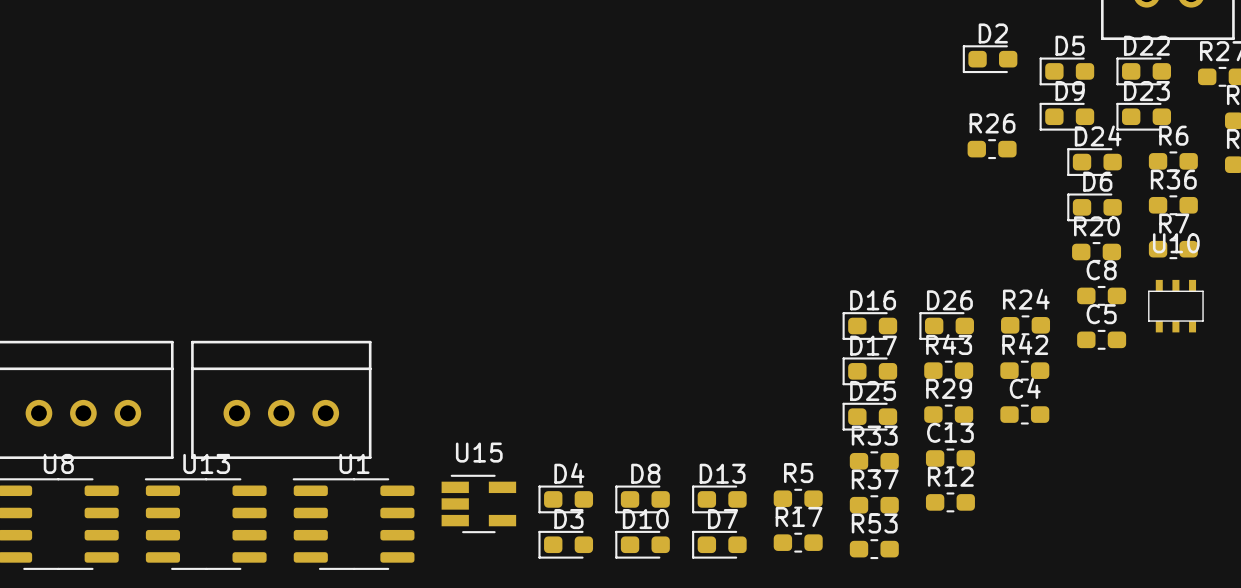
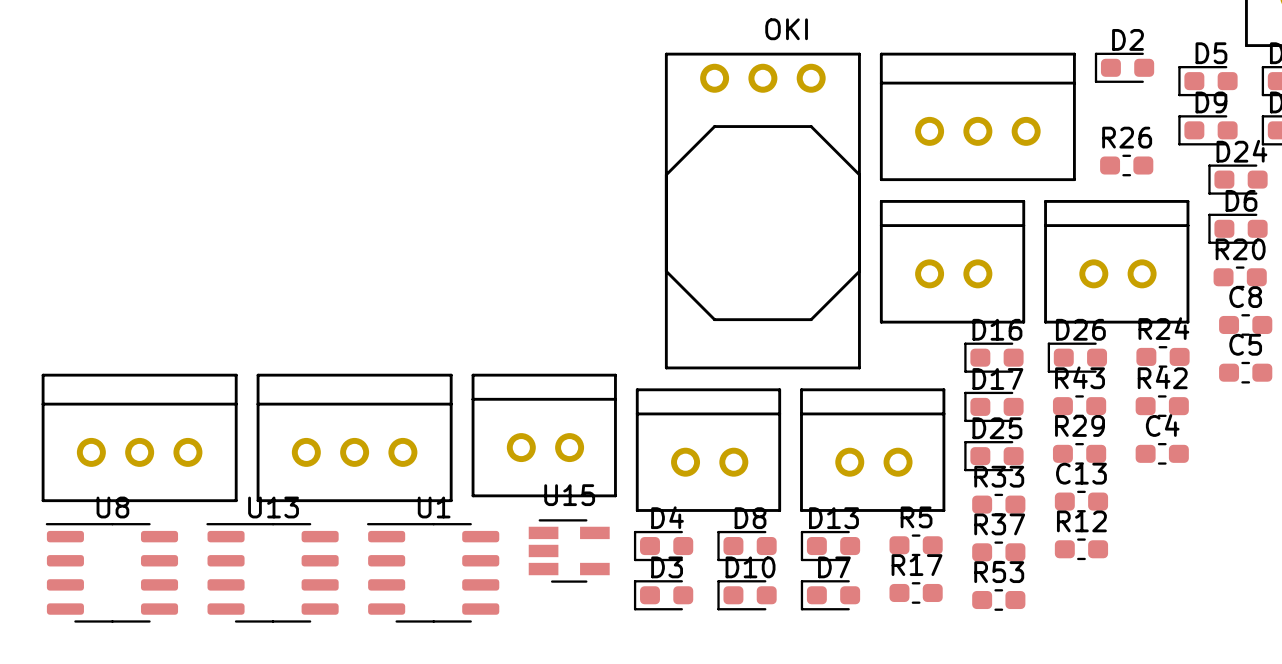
part: none -> (977, 116)
part: none -> OKI (762, 211)
part: none -> (952, 261)
part: none -> (1116, 261)
part: none -> (544, 435)
part: none -> (708, 450)
part: none -> (872, 450)

